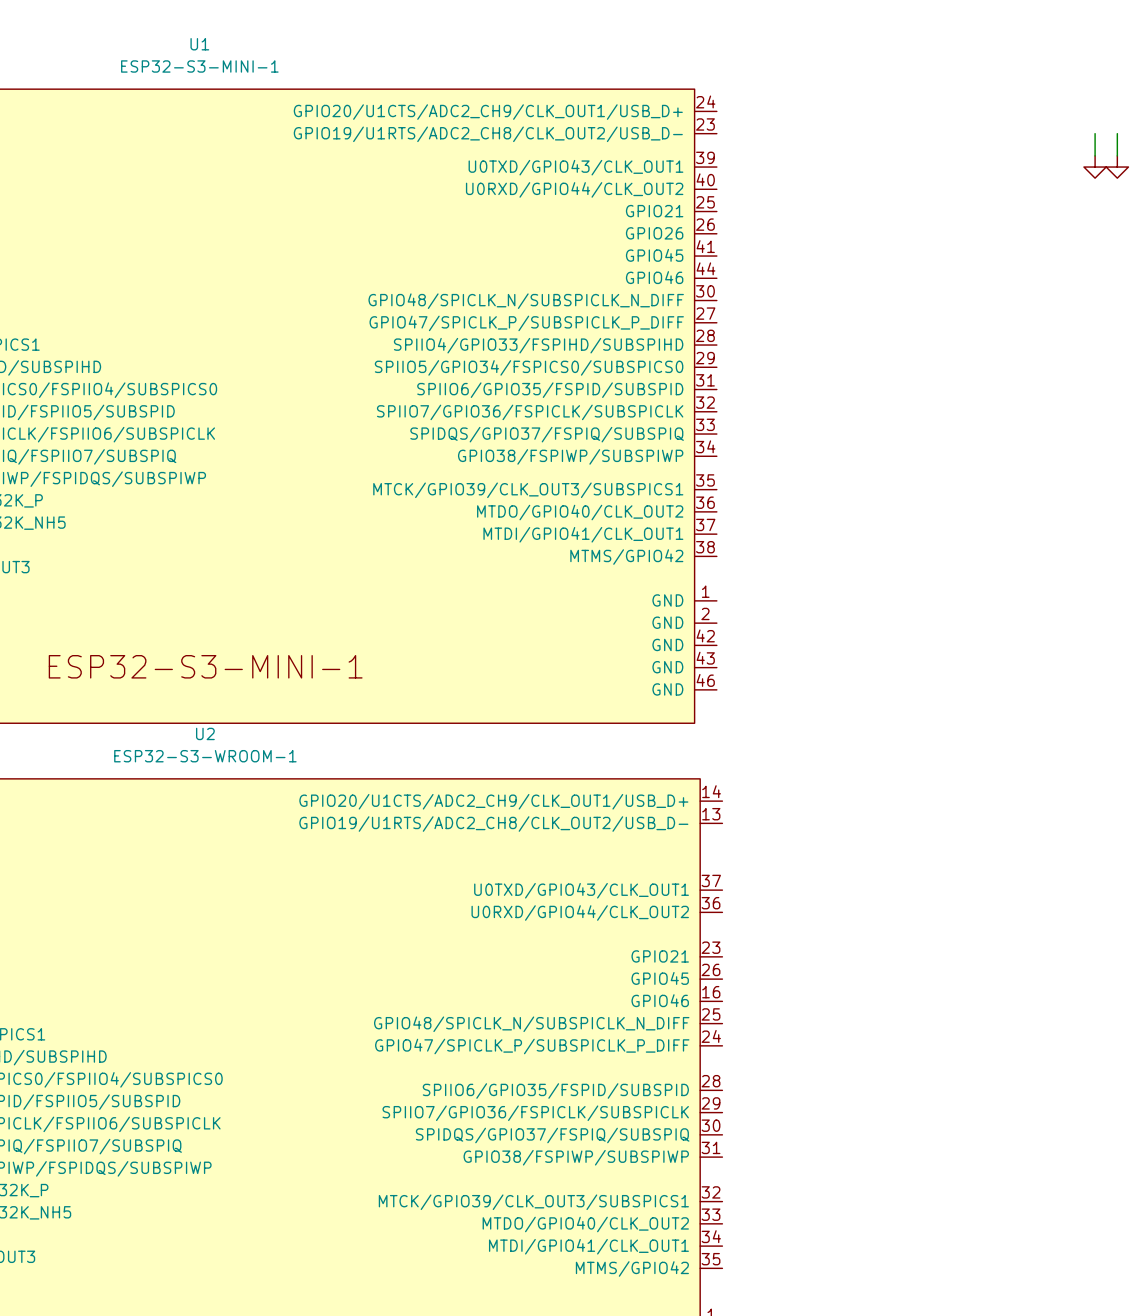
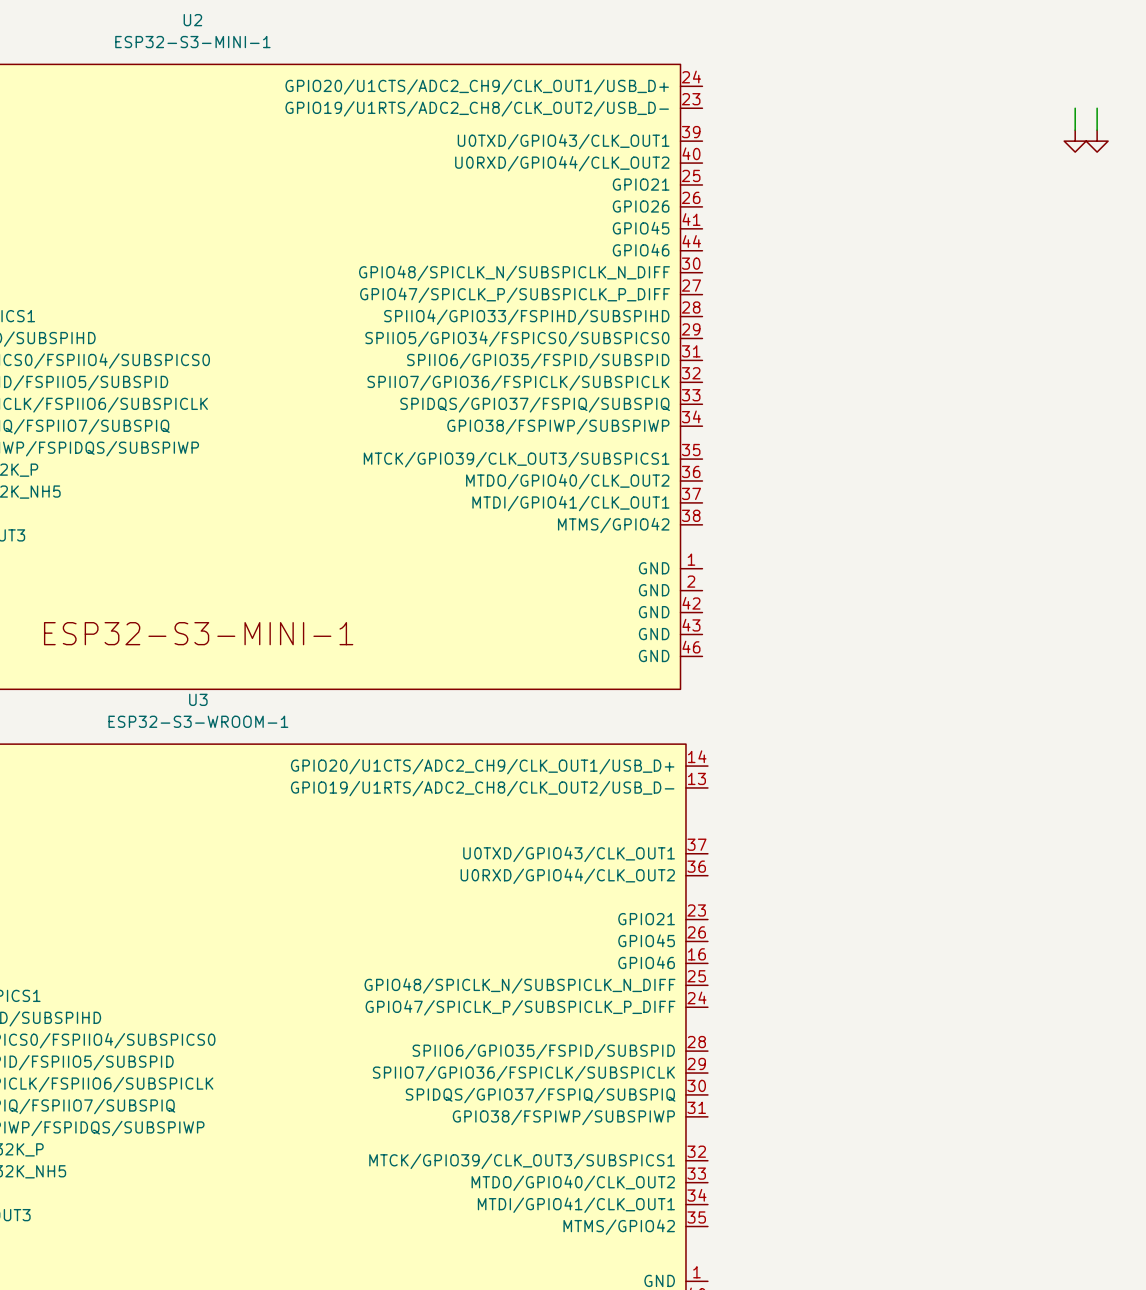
U1 name: U1 (199, 44) -> U2 (192, 20)
U2 name: U2 (205, 733) -> U3 (198, 699)

